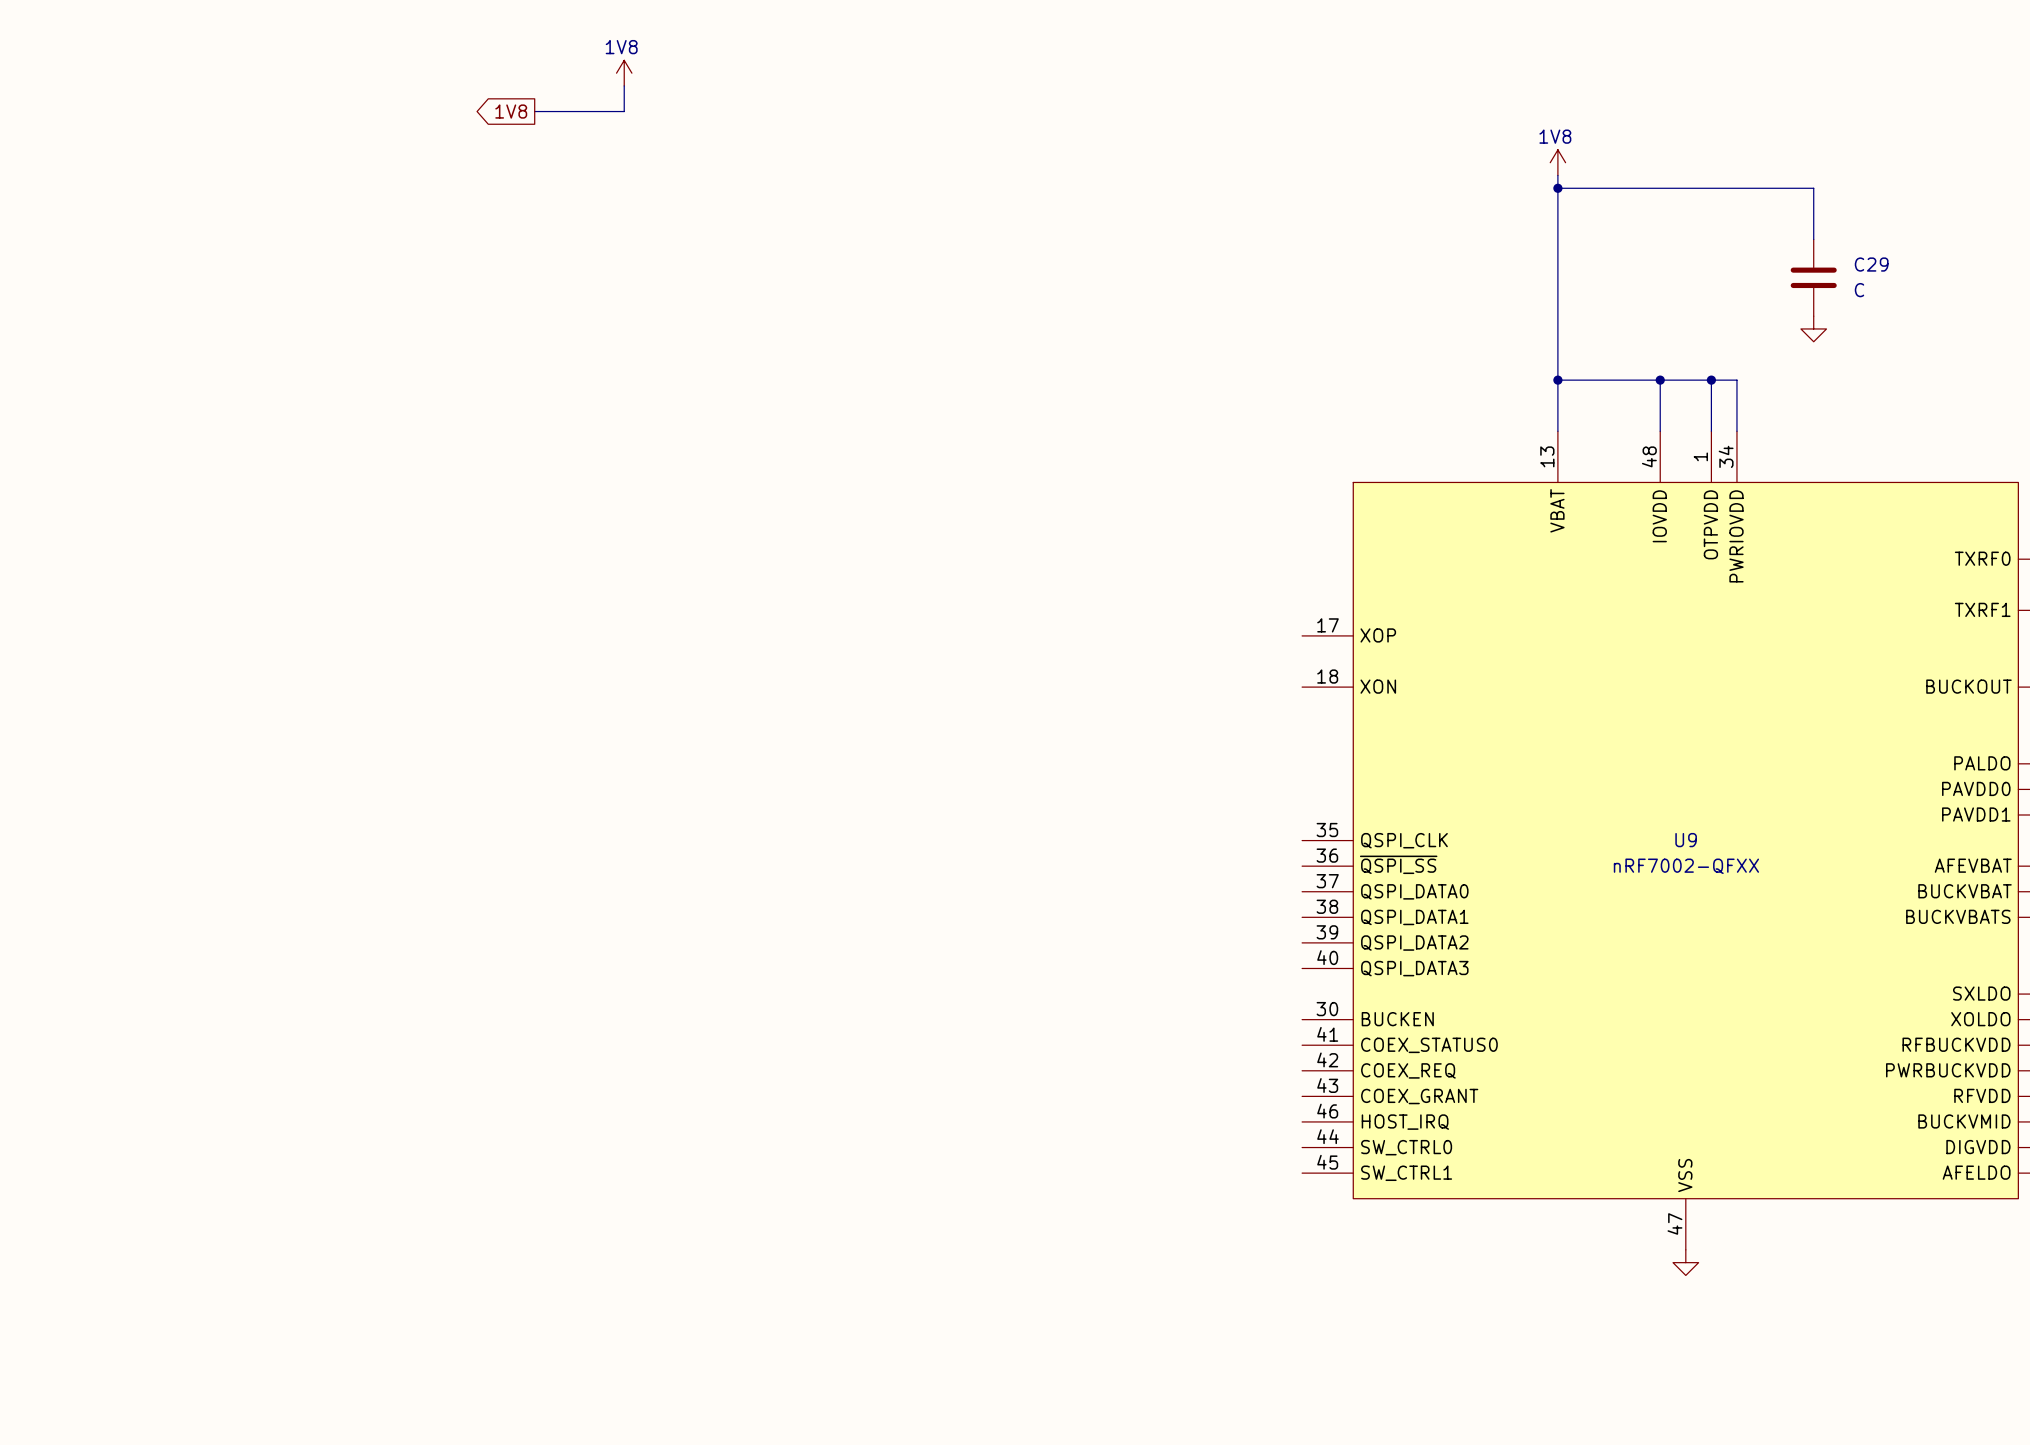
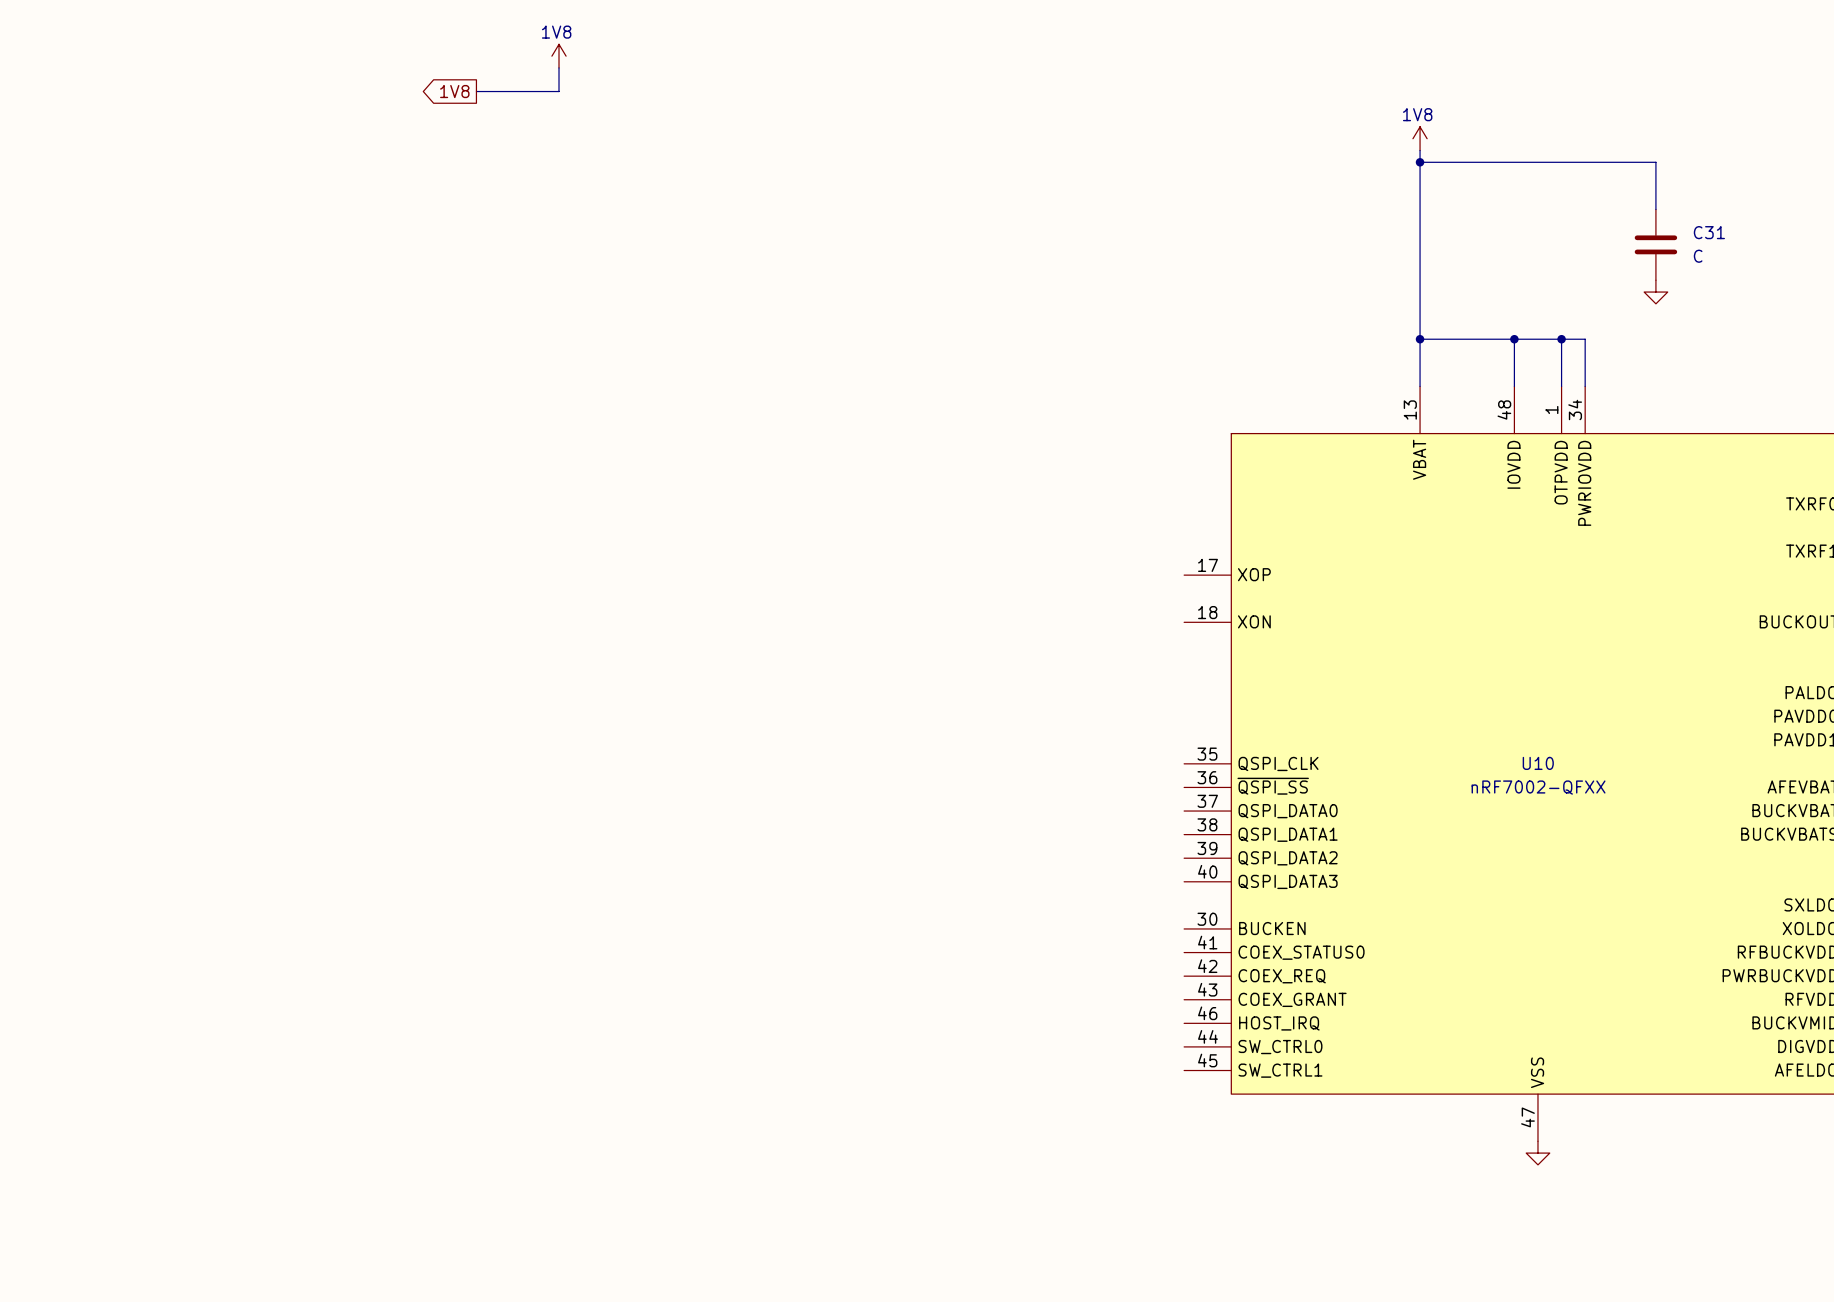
C29 name: C29 (1871, 264) -> C31 (1709, 232)
U9 name: U9 (1686, 840) -> U10 (1538, 763)

